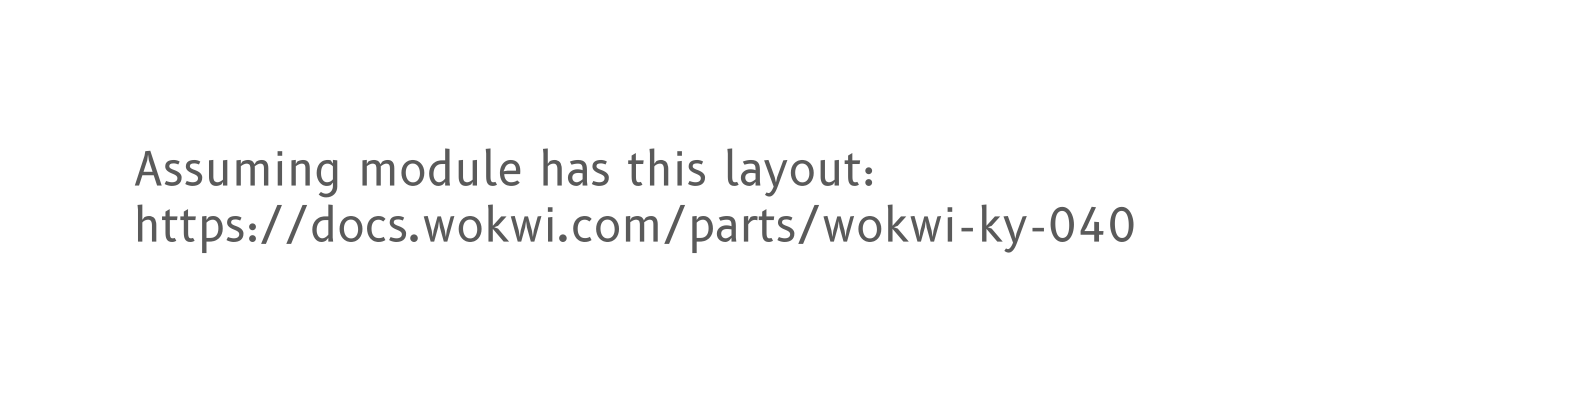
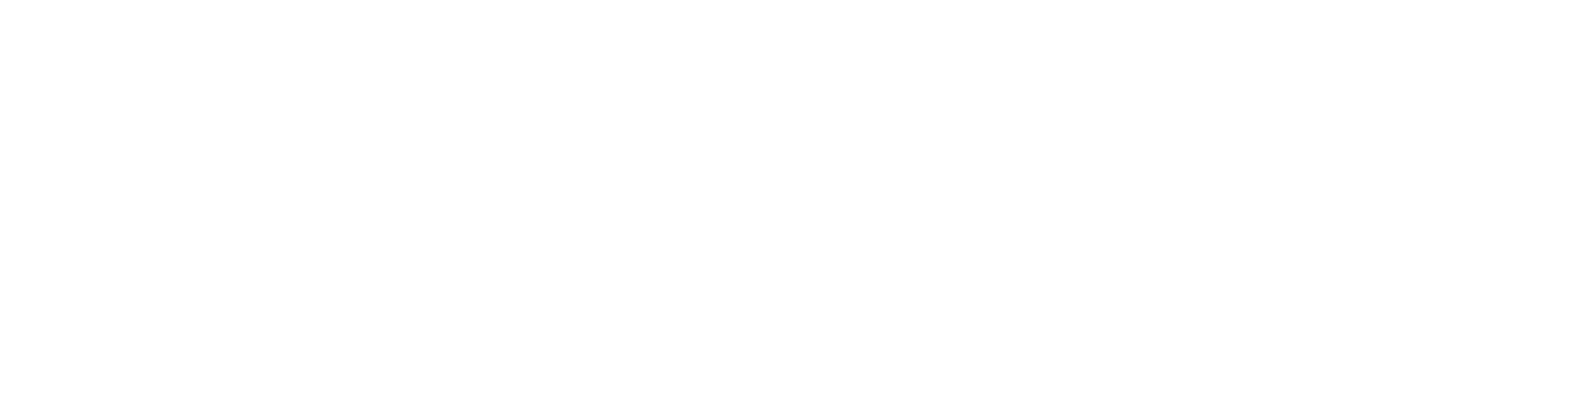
text: Assuming module has this layout: (503, 172) -> none
text: https://docs.wokwi.com/parts/wokwi-ky-040 (635, 228) -> none

